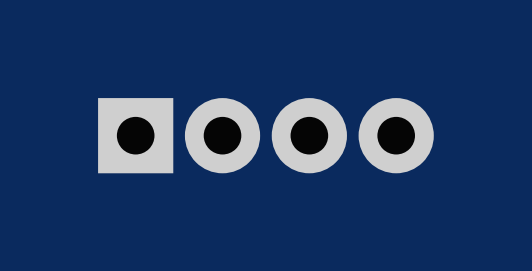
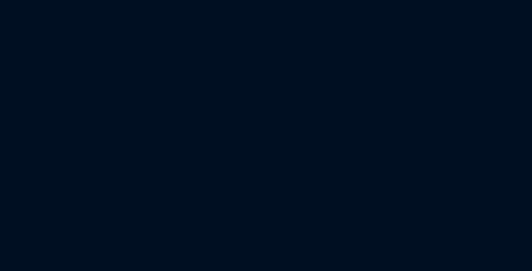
part: (265, 135) -> none

